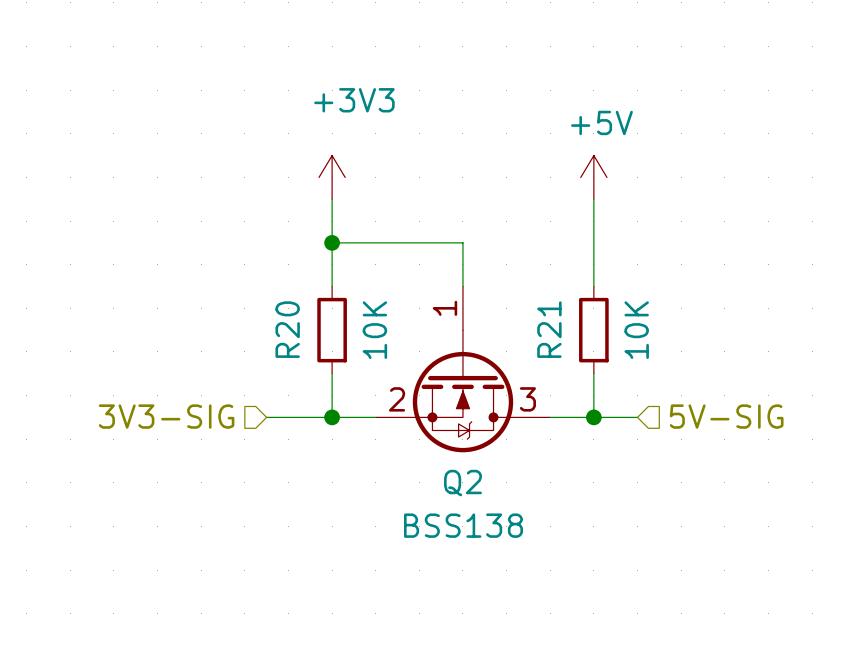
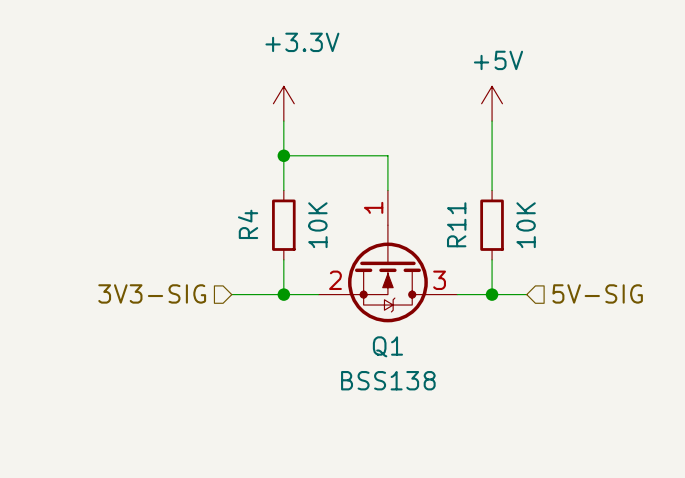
power symbol: +3V3 (332, 177) -> +3.3V (283, 103)
R20 name: R20 (287, 329) -> R4 (248, 224)
R21 name: R21 (549, 329) -> R11 (456, 224)
Q2 name: Q2 (462, 483) -> Q1 (387, 346)

